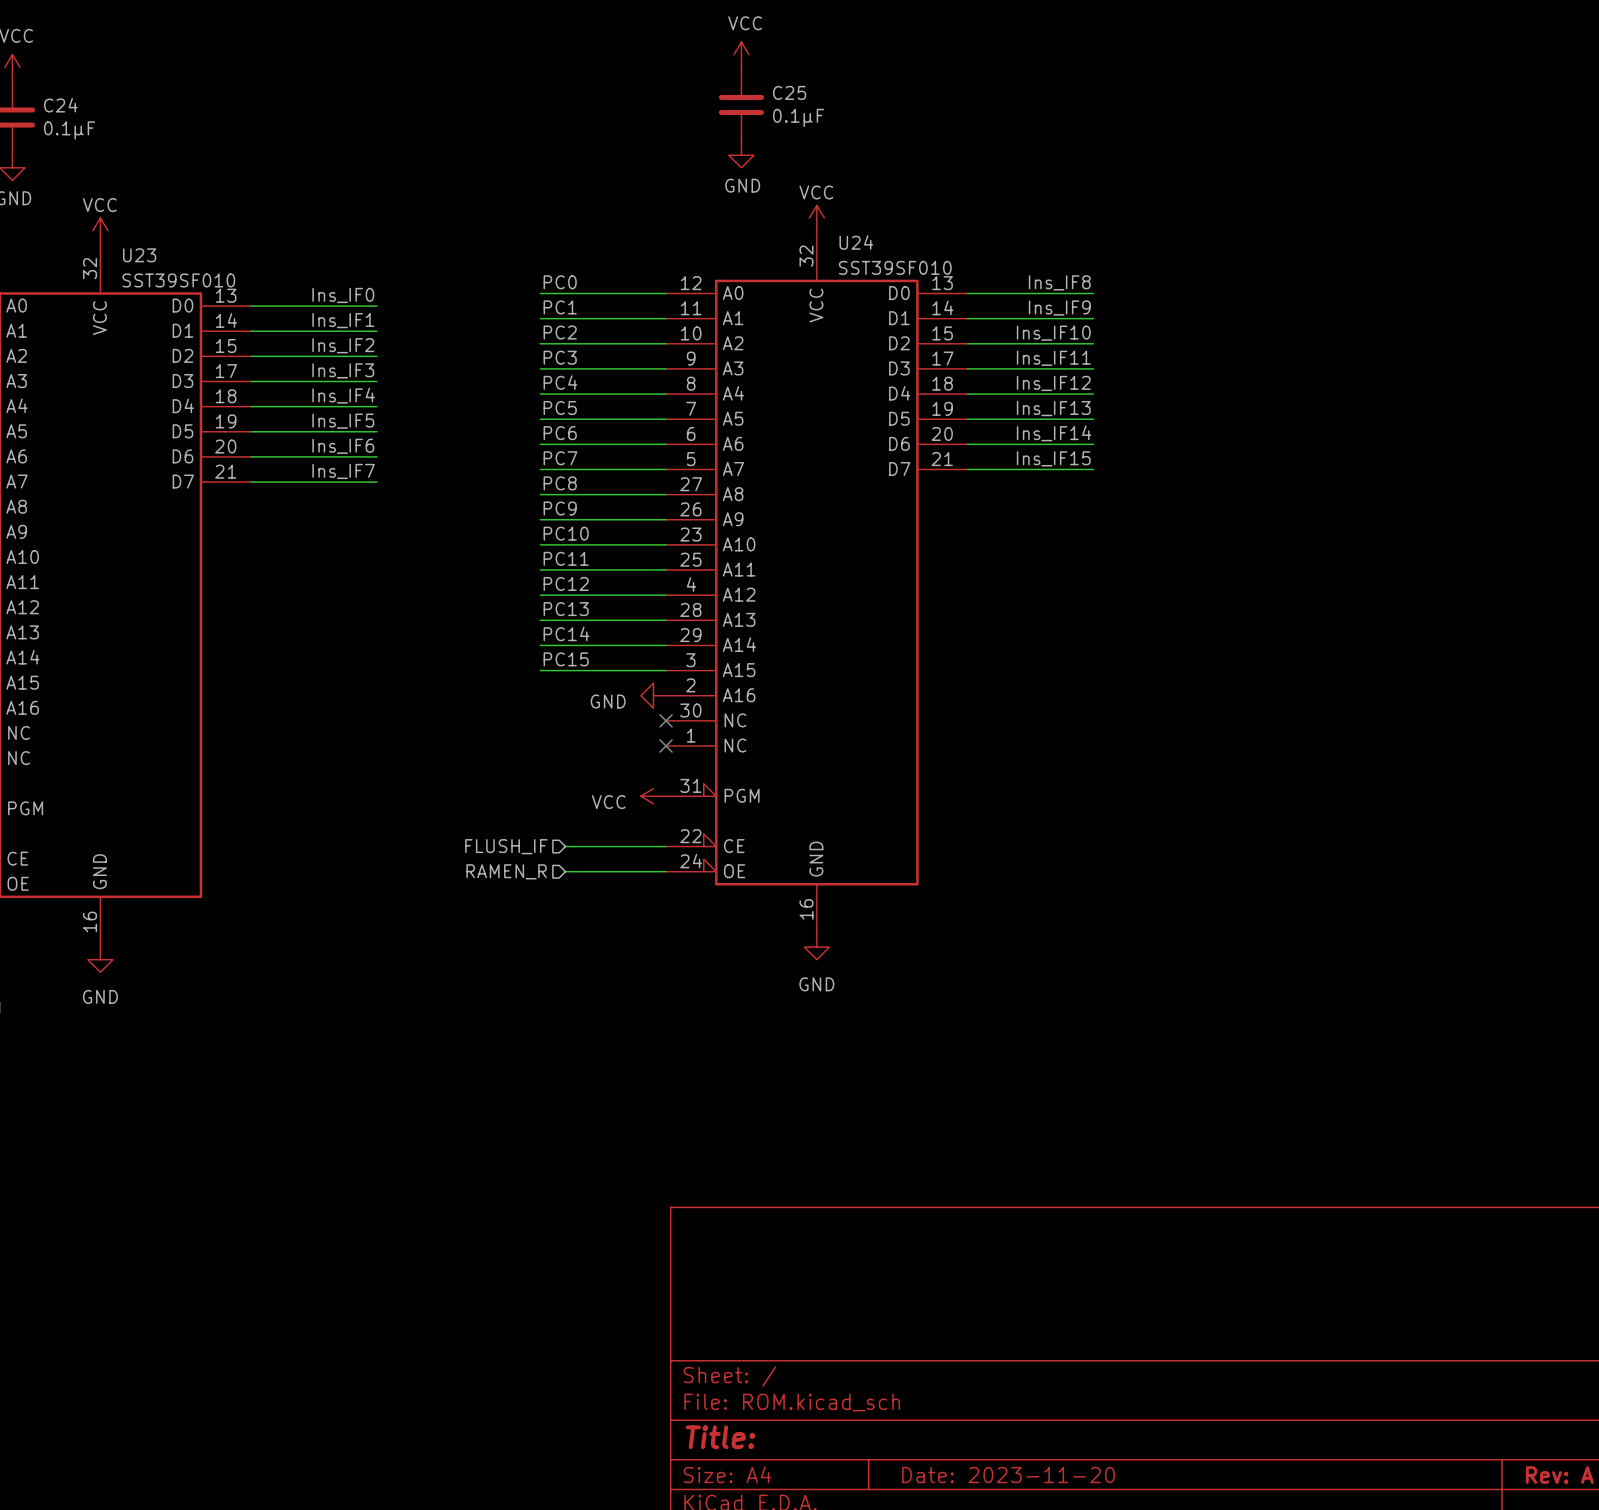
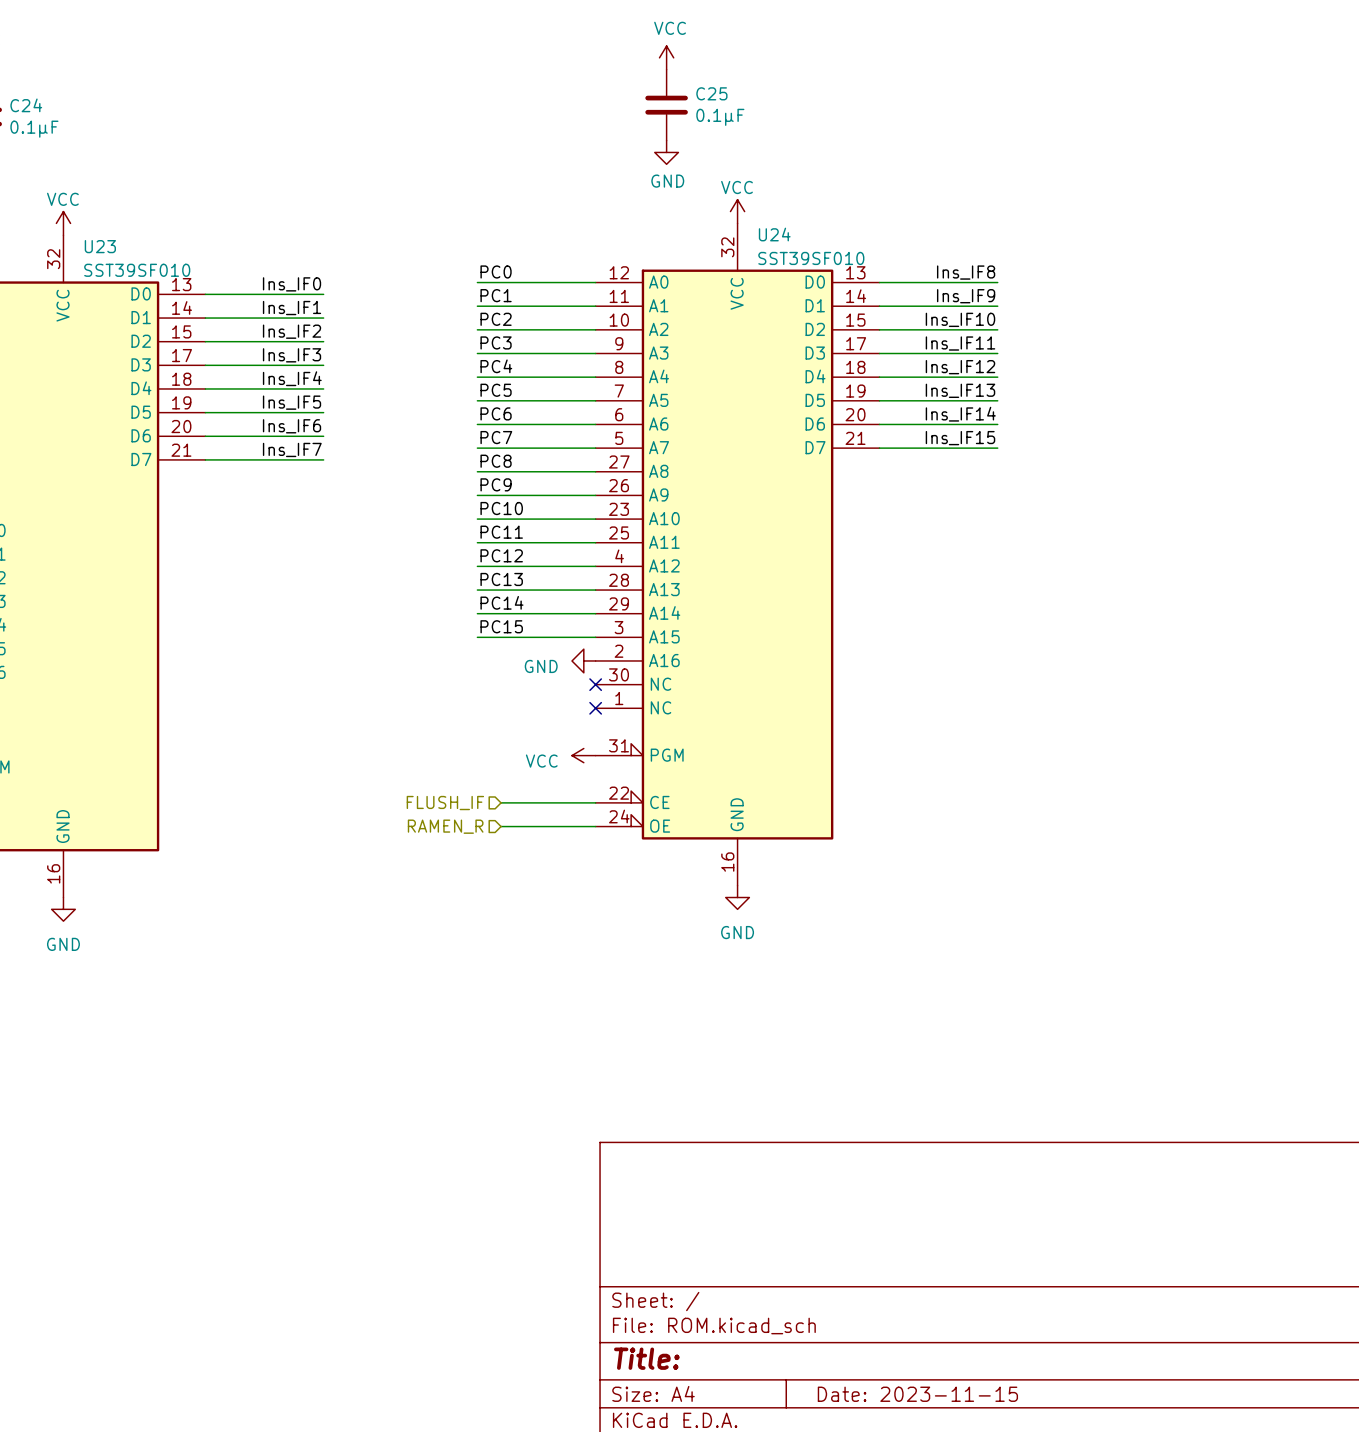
title block: Date: 2023-11-20 (1008, 1475) -> Date: 2023-11-15 (917, 1394)

